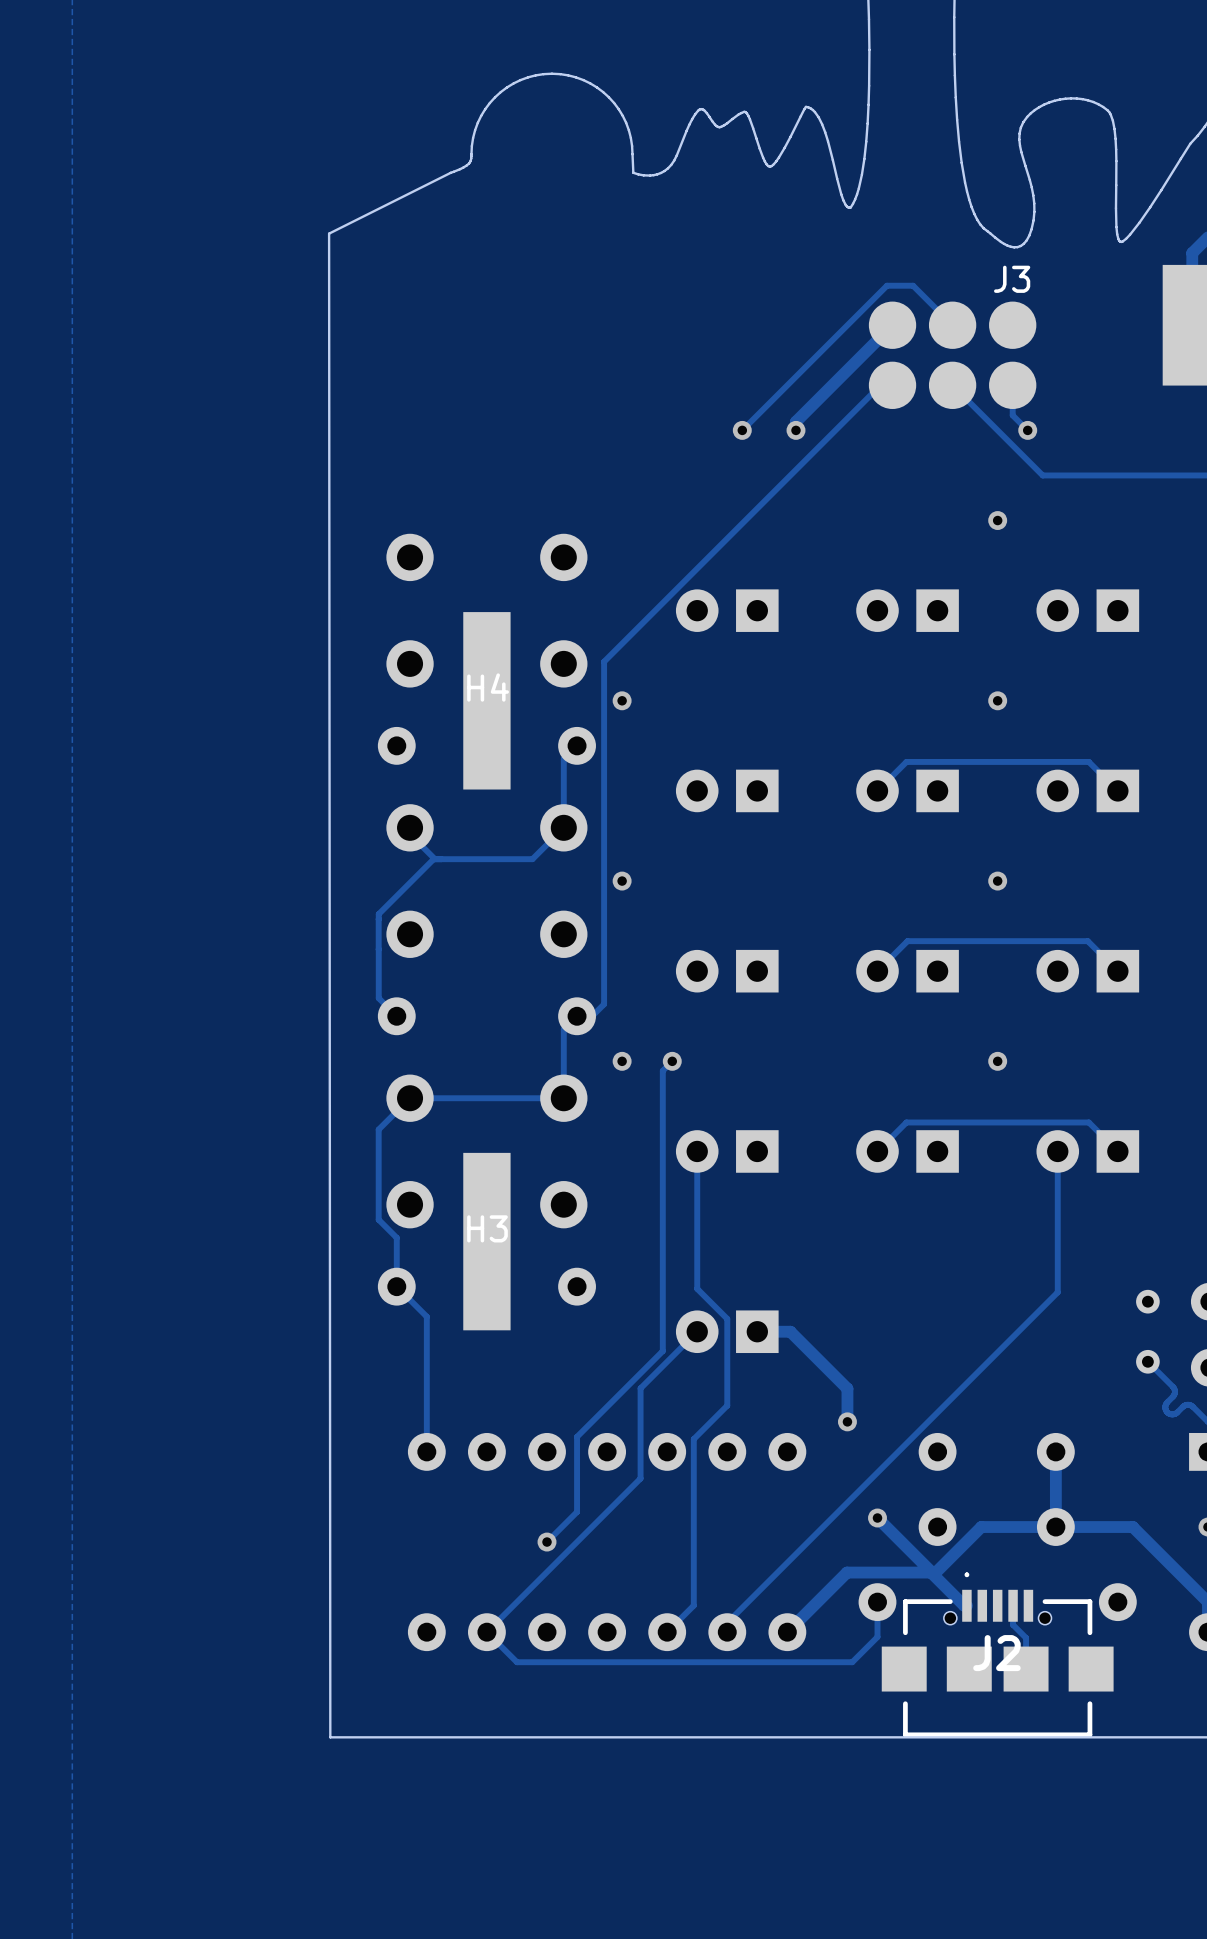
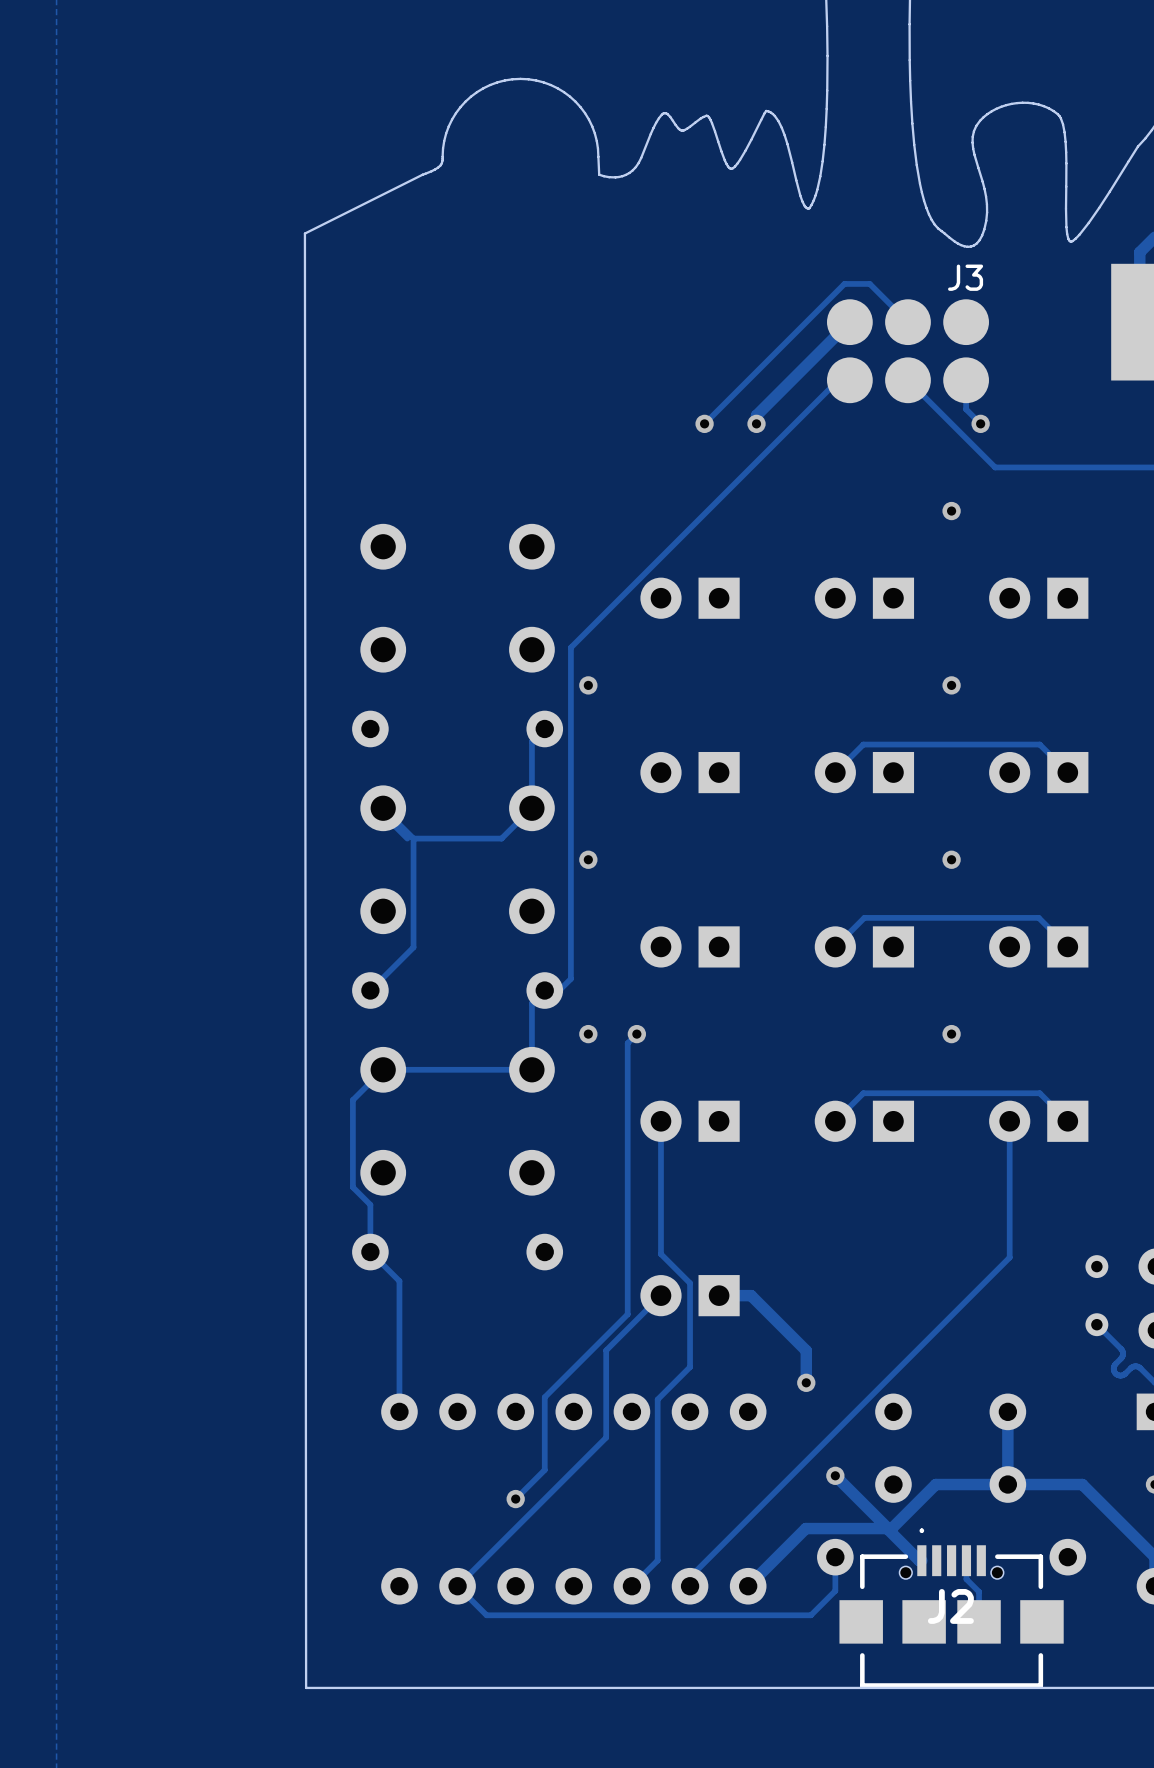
part: (486, 700) -> none
track: (441, 859) (433, 859) (378, 914) (378, 919) -> none
track: (378, 919) (378, 949) -> none
track: (378, 949) (378, 998) (396, 1016) -> (383, 808) (413, 838) (413, 947) (370, 990)
part: (486, 1241) -> none

